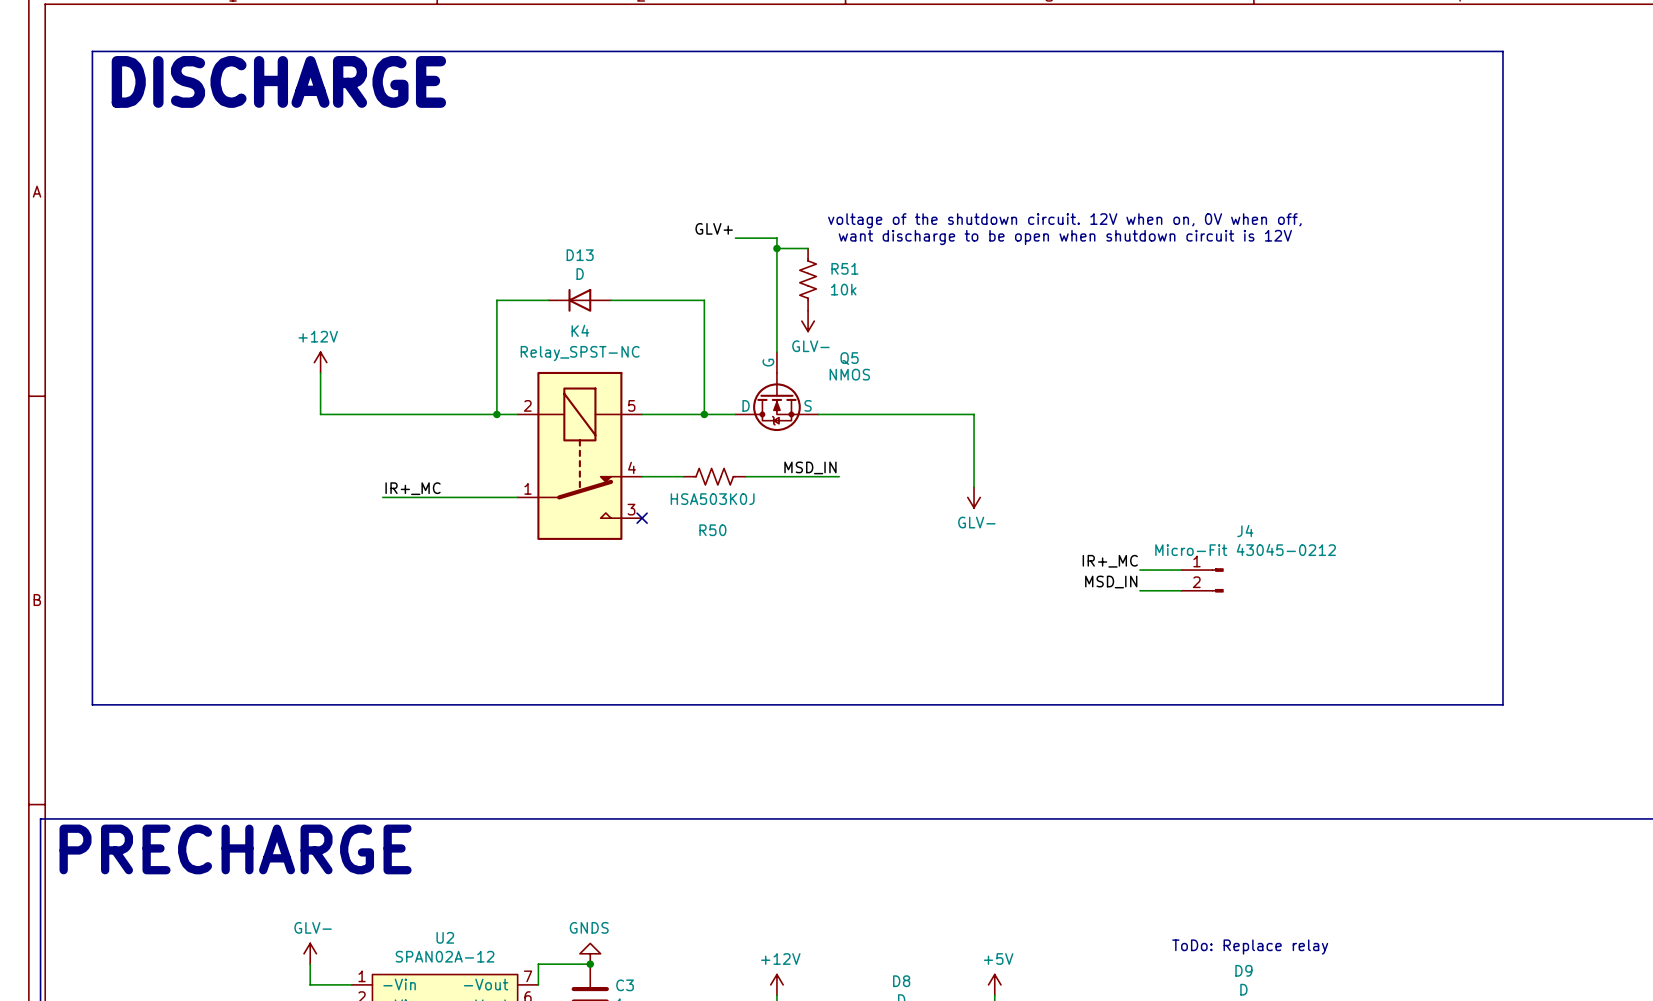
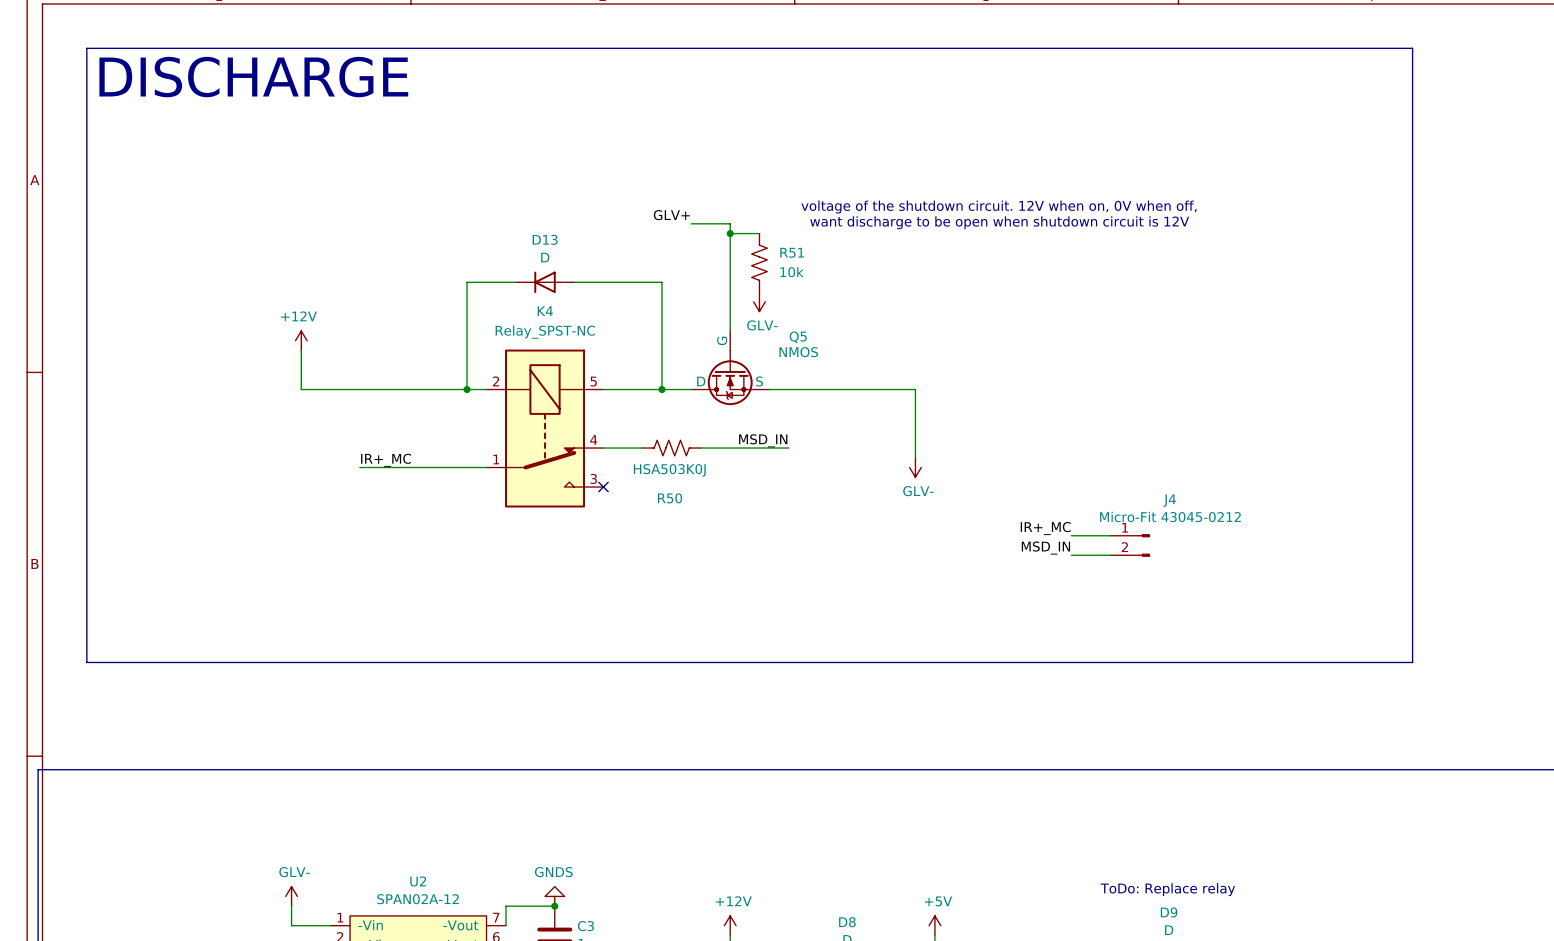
text: PRECHARGE (235, 849) -> none

